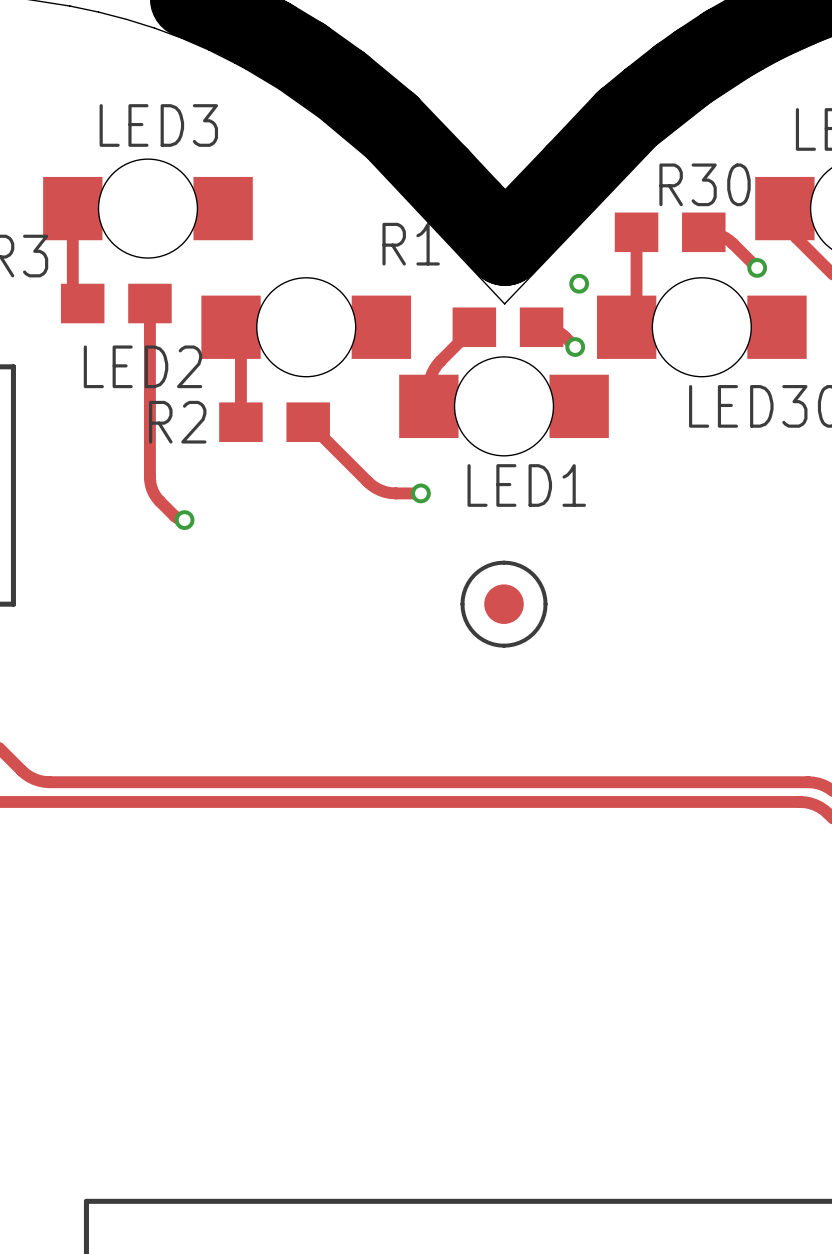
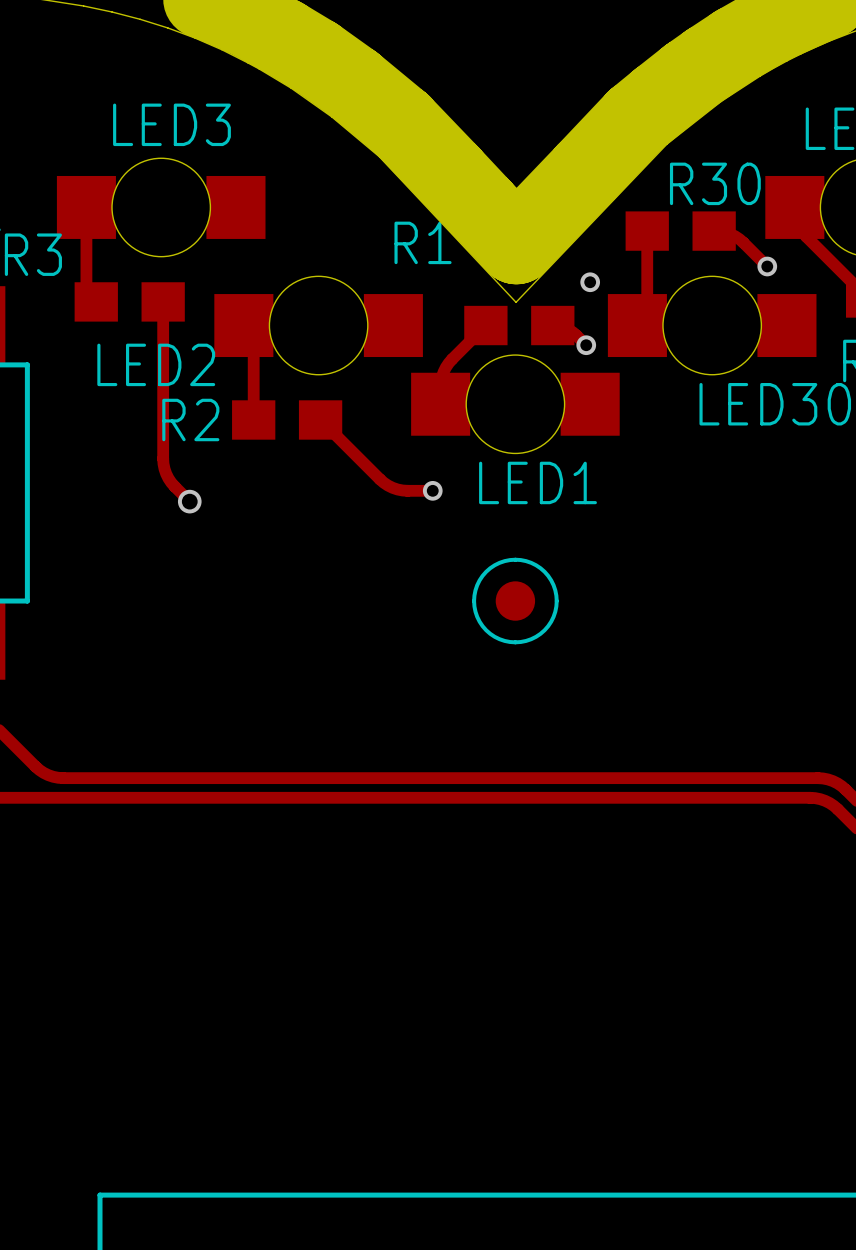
track: (149, 461) (150, 481) (154, 494) (175, 517) (184, 520) -> (163, 458) (168, 478) (189, 501)
via position: (184, 520) -> (189, 501)

